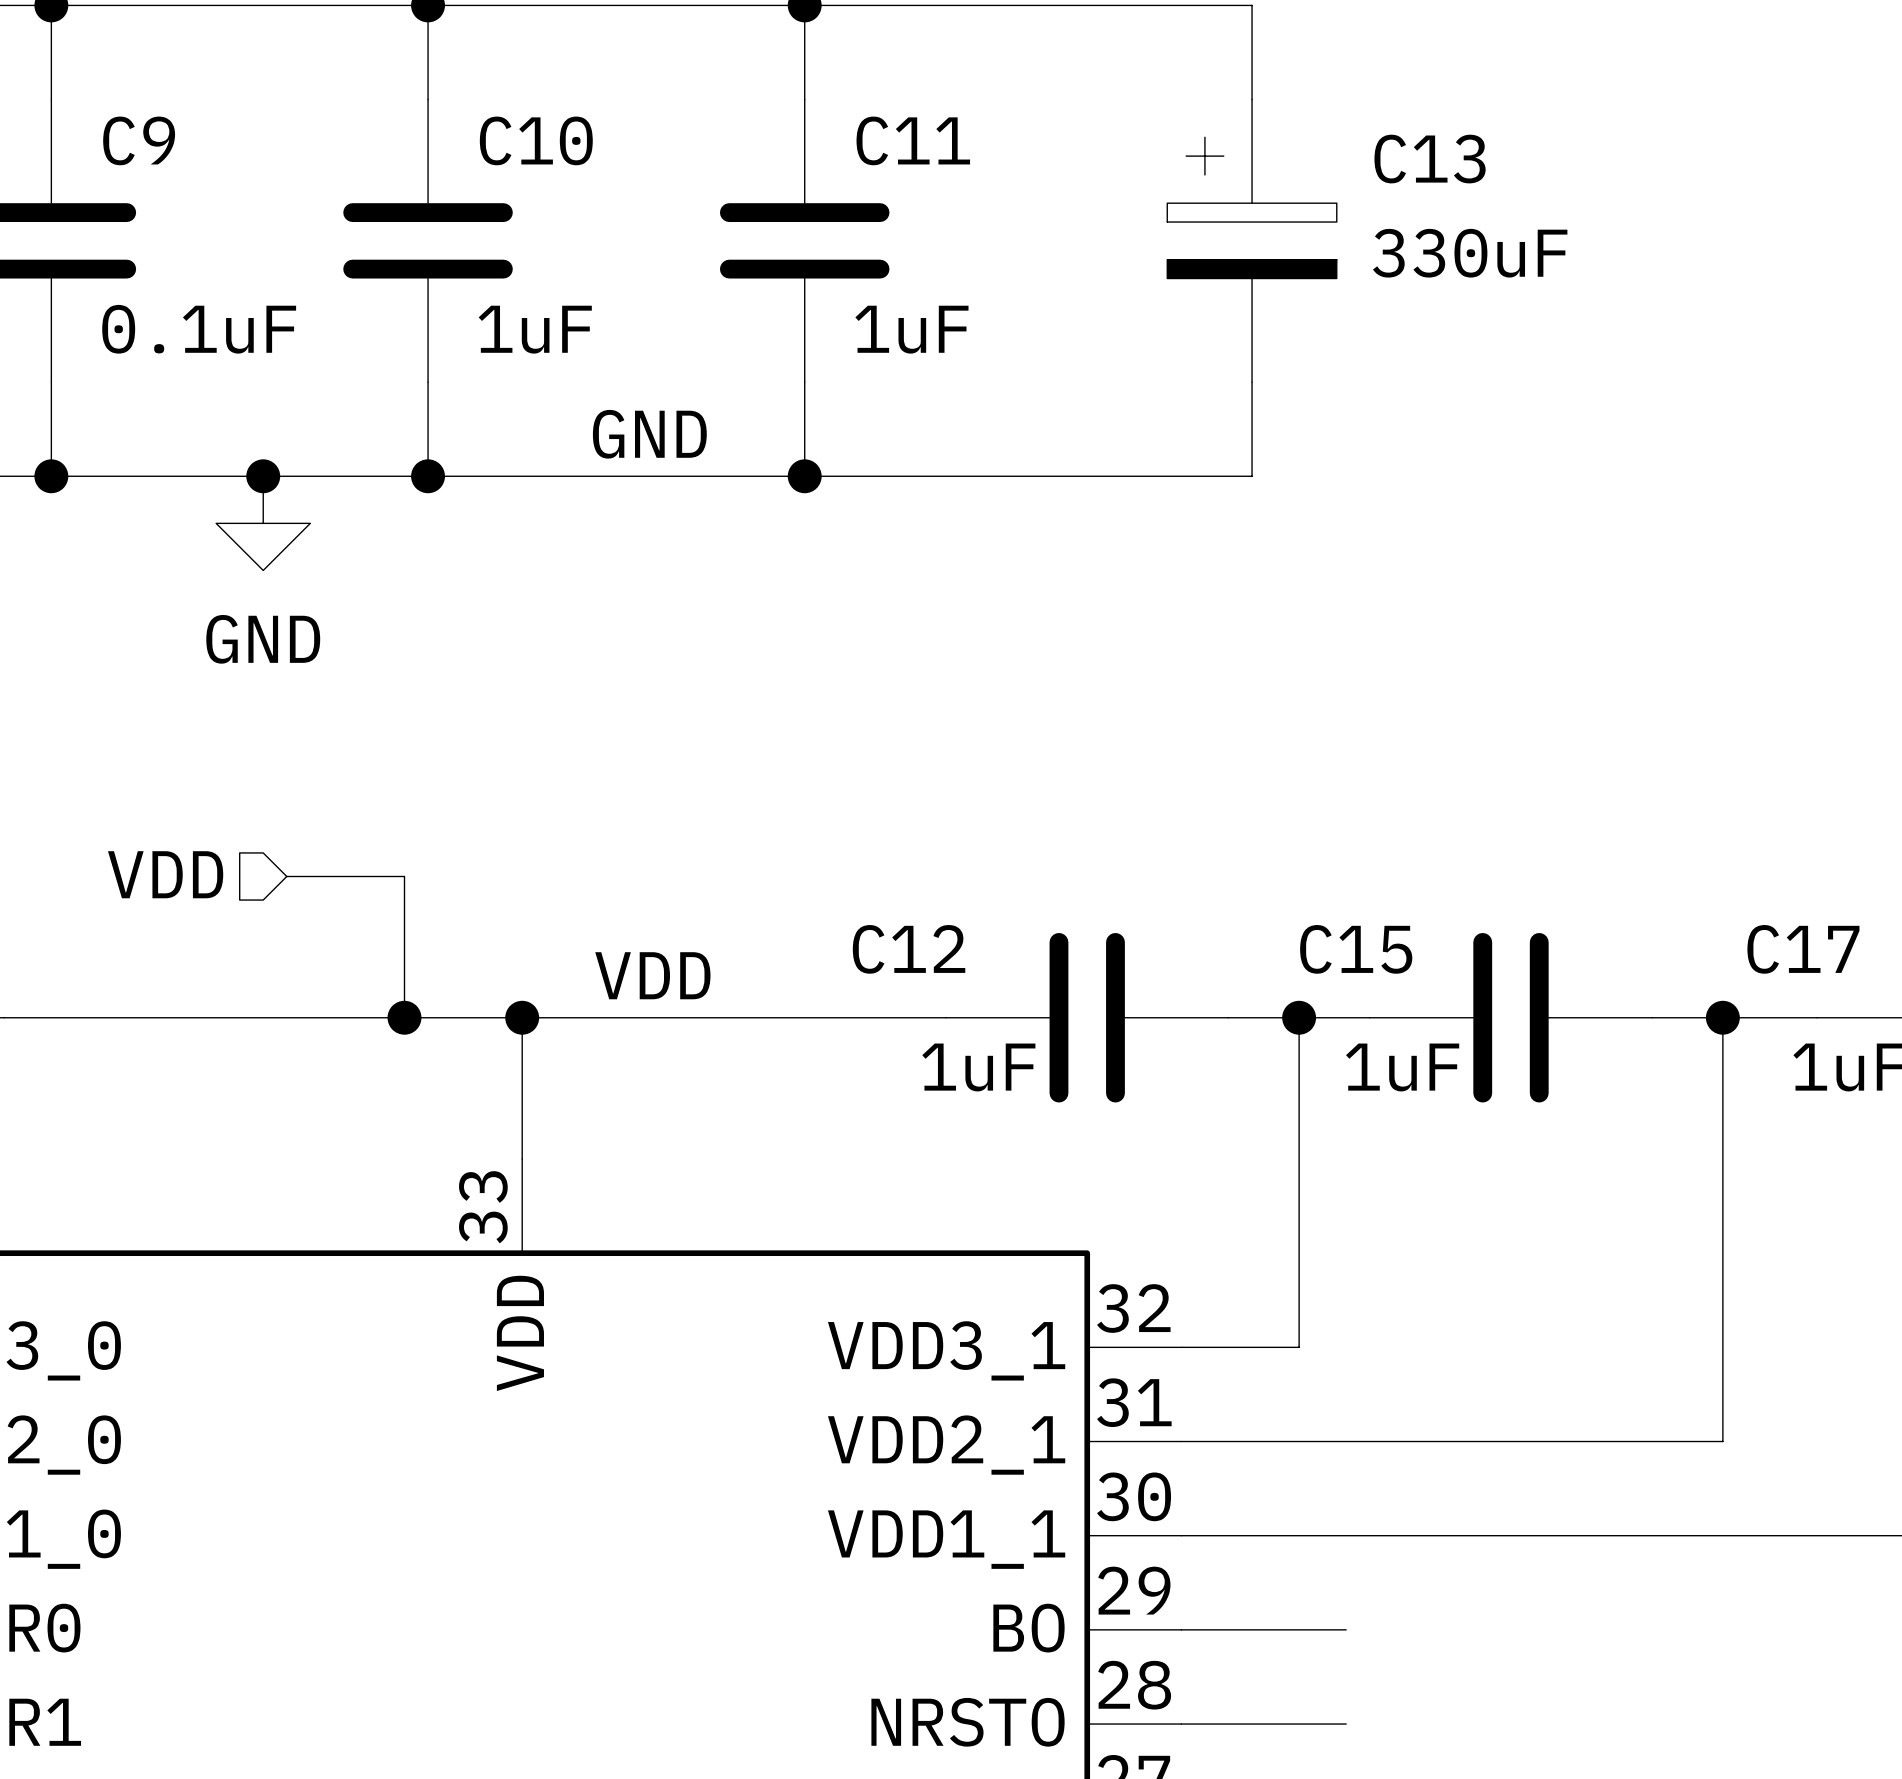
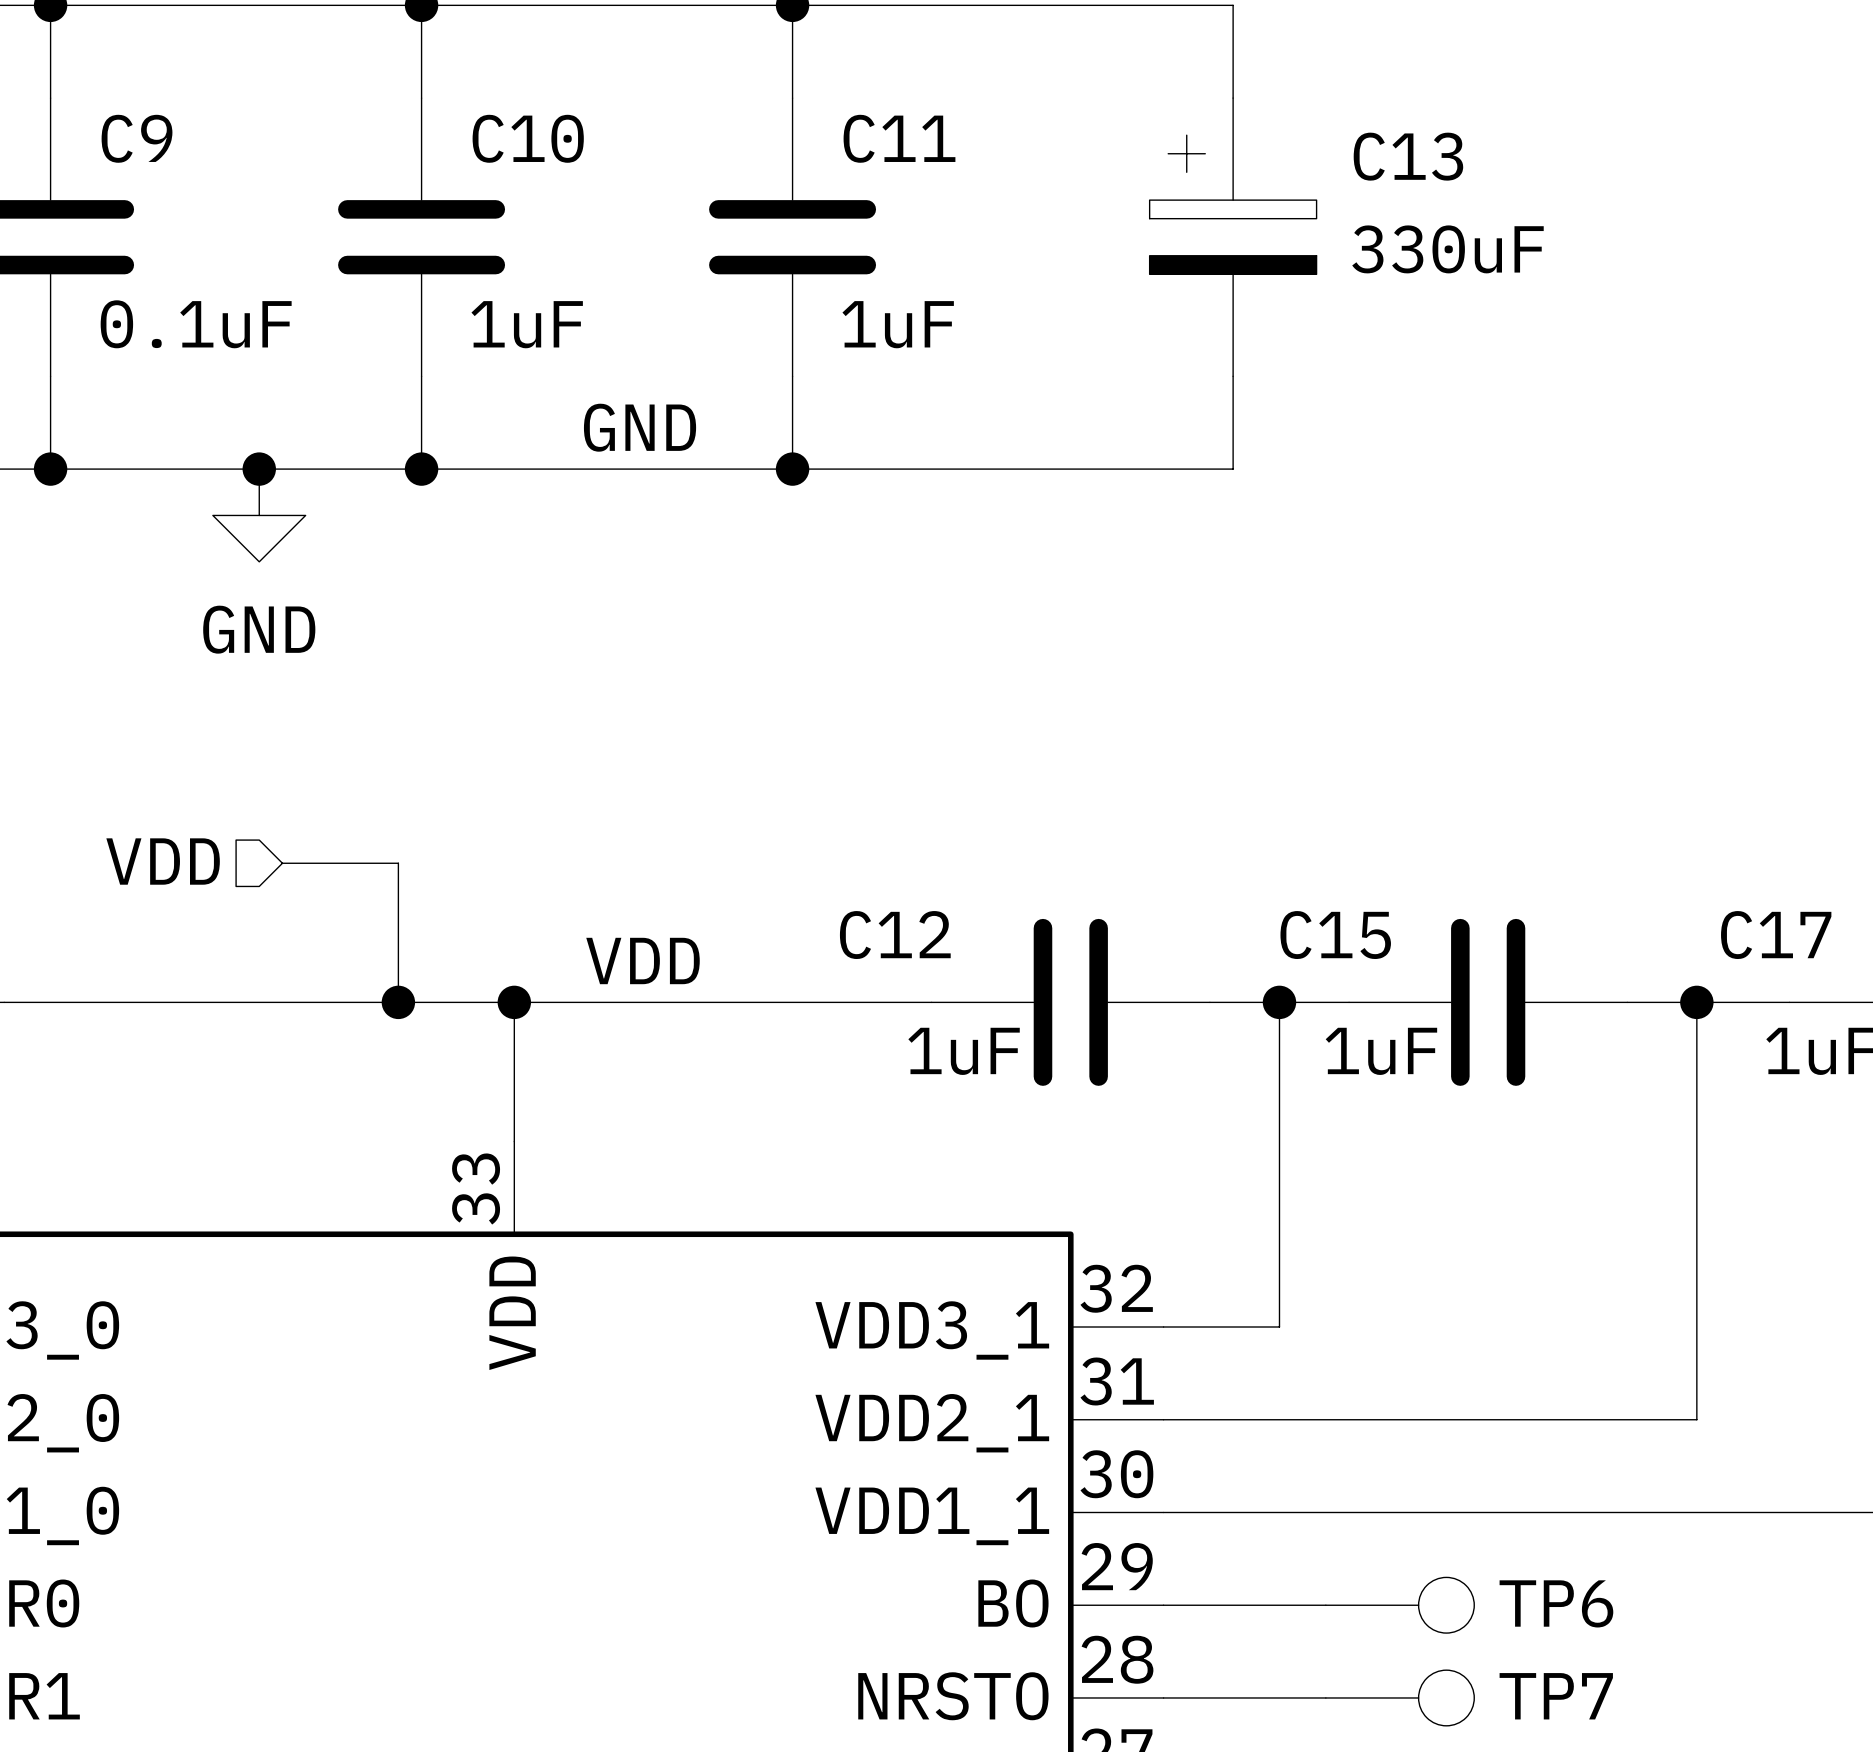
TP6: none -> (1400, 1605)
TP7: none -> (1400, 1697)

